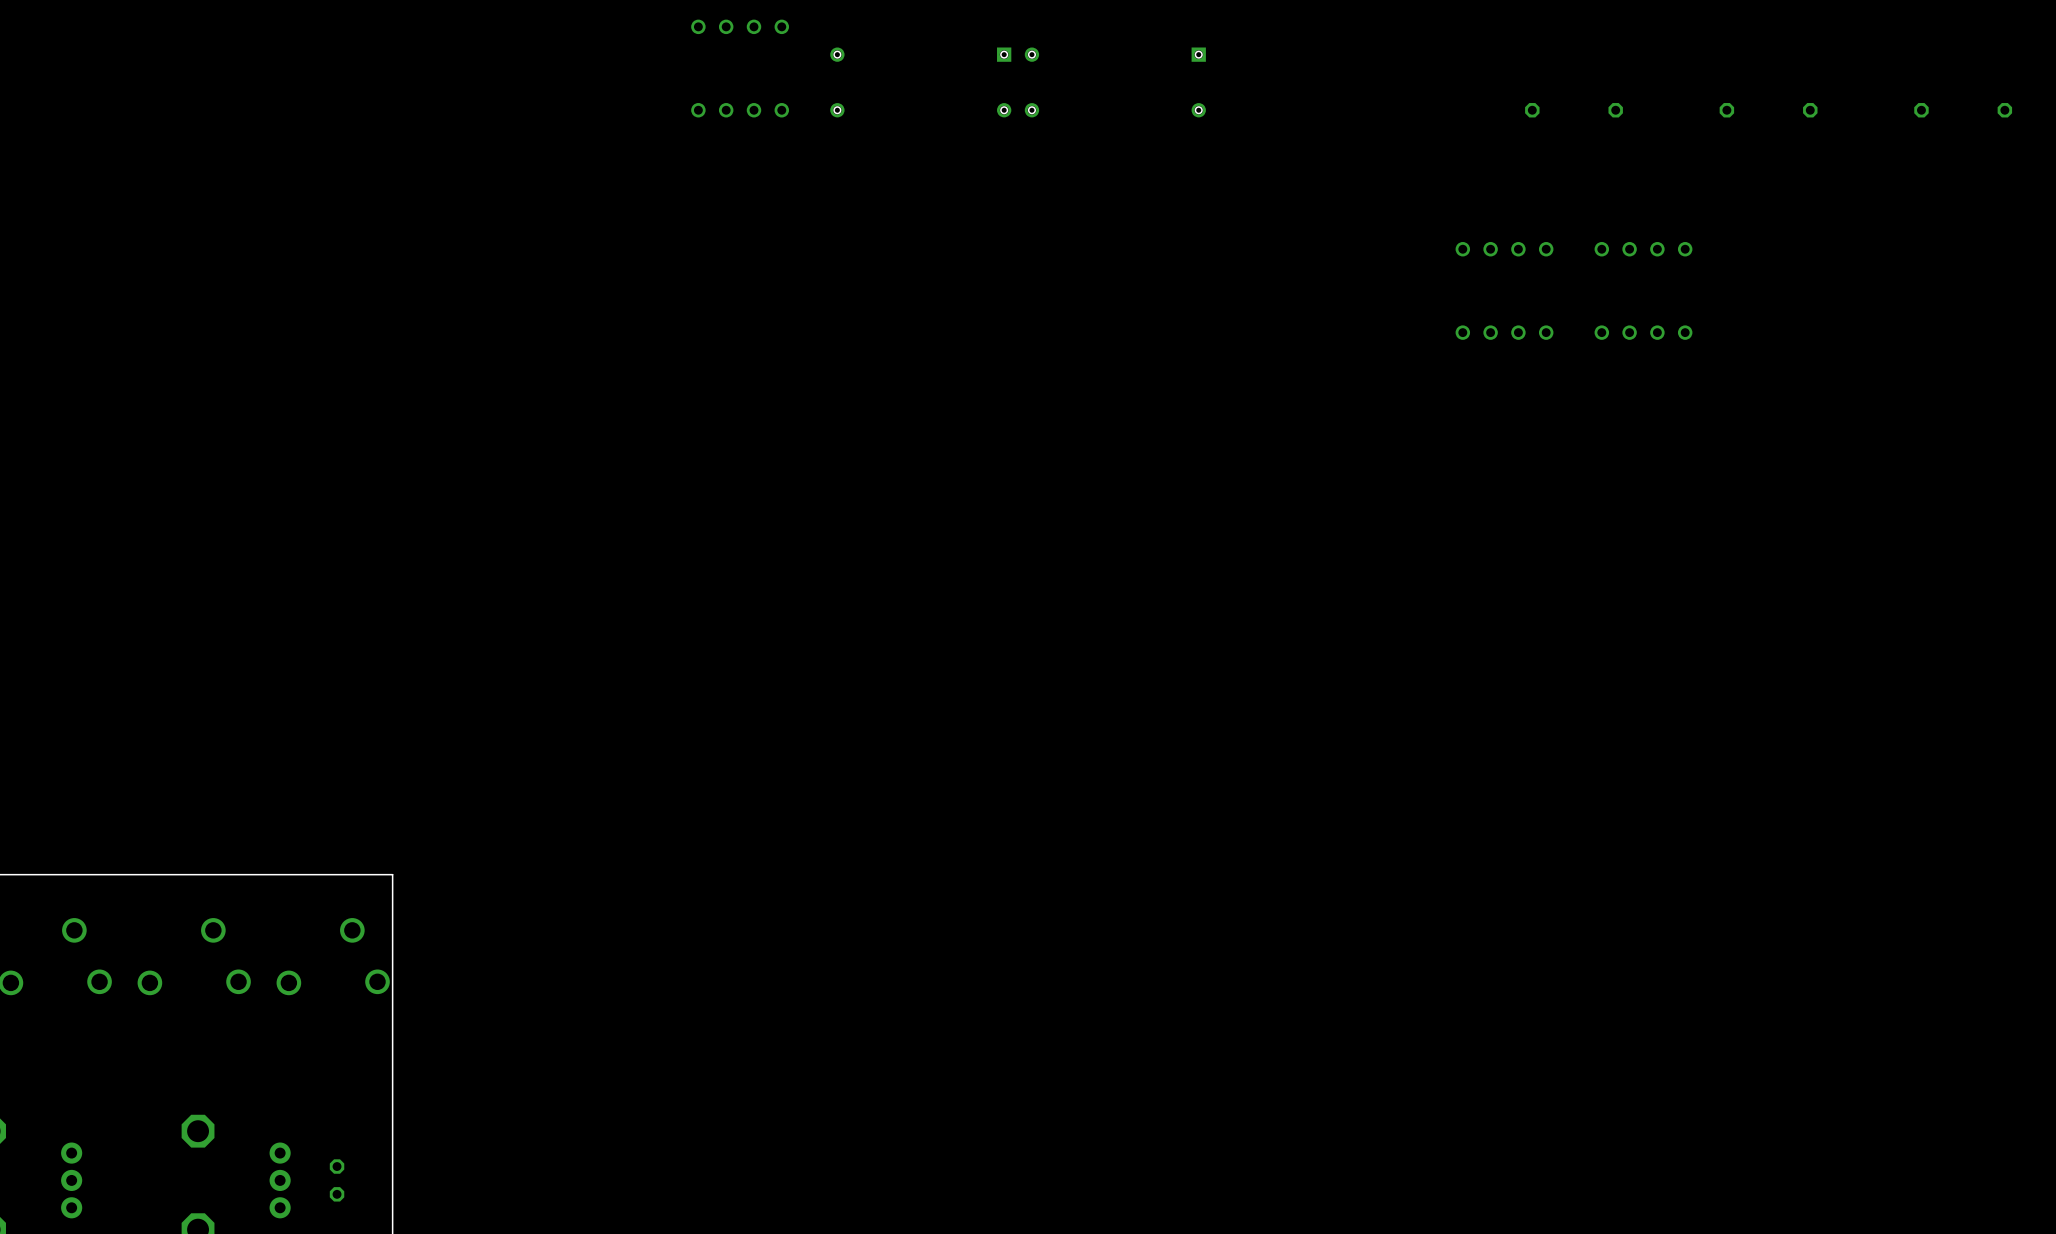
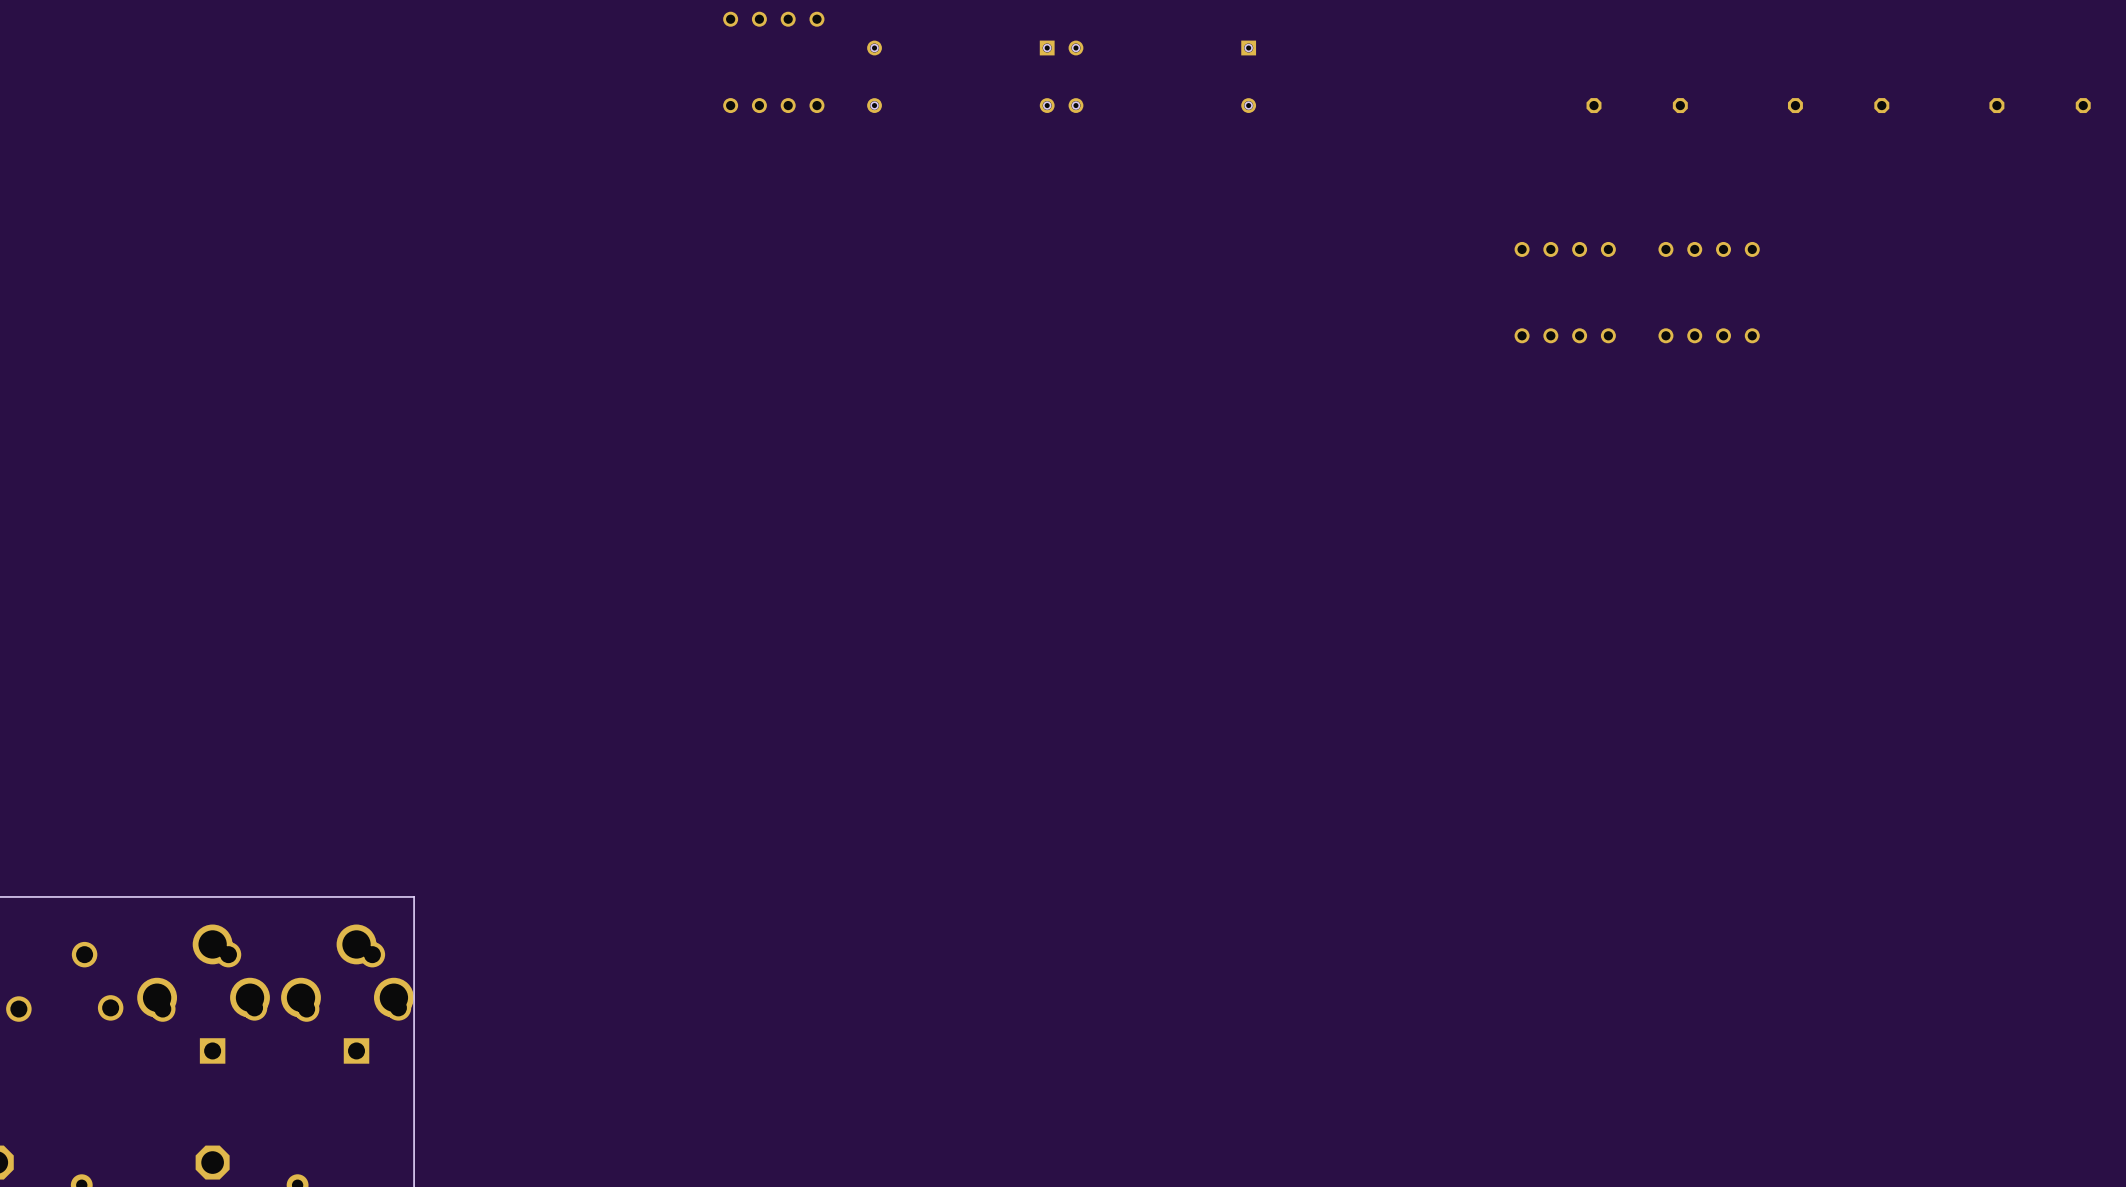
part: none -> (203, 994)
part: none -> (347, 994)

